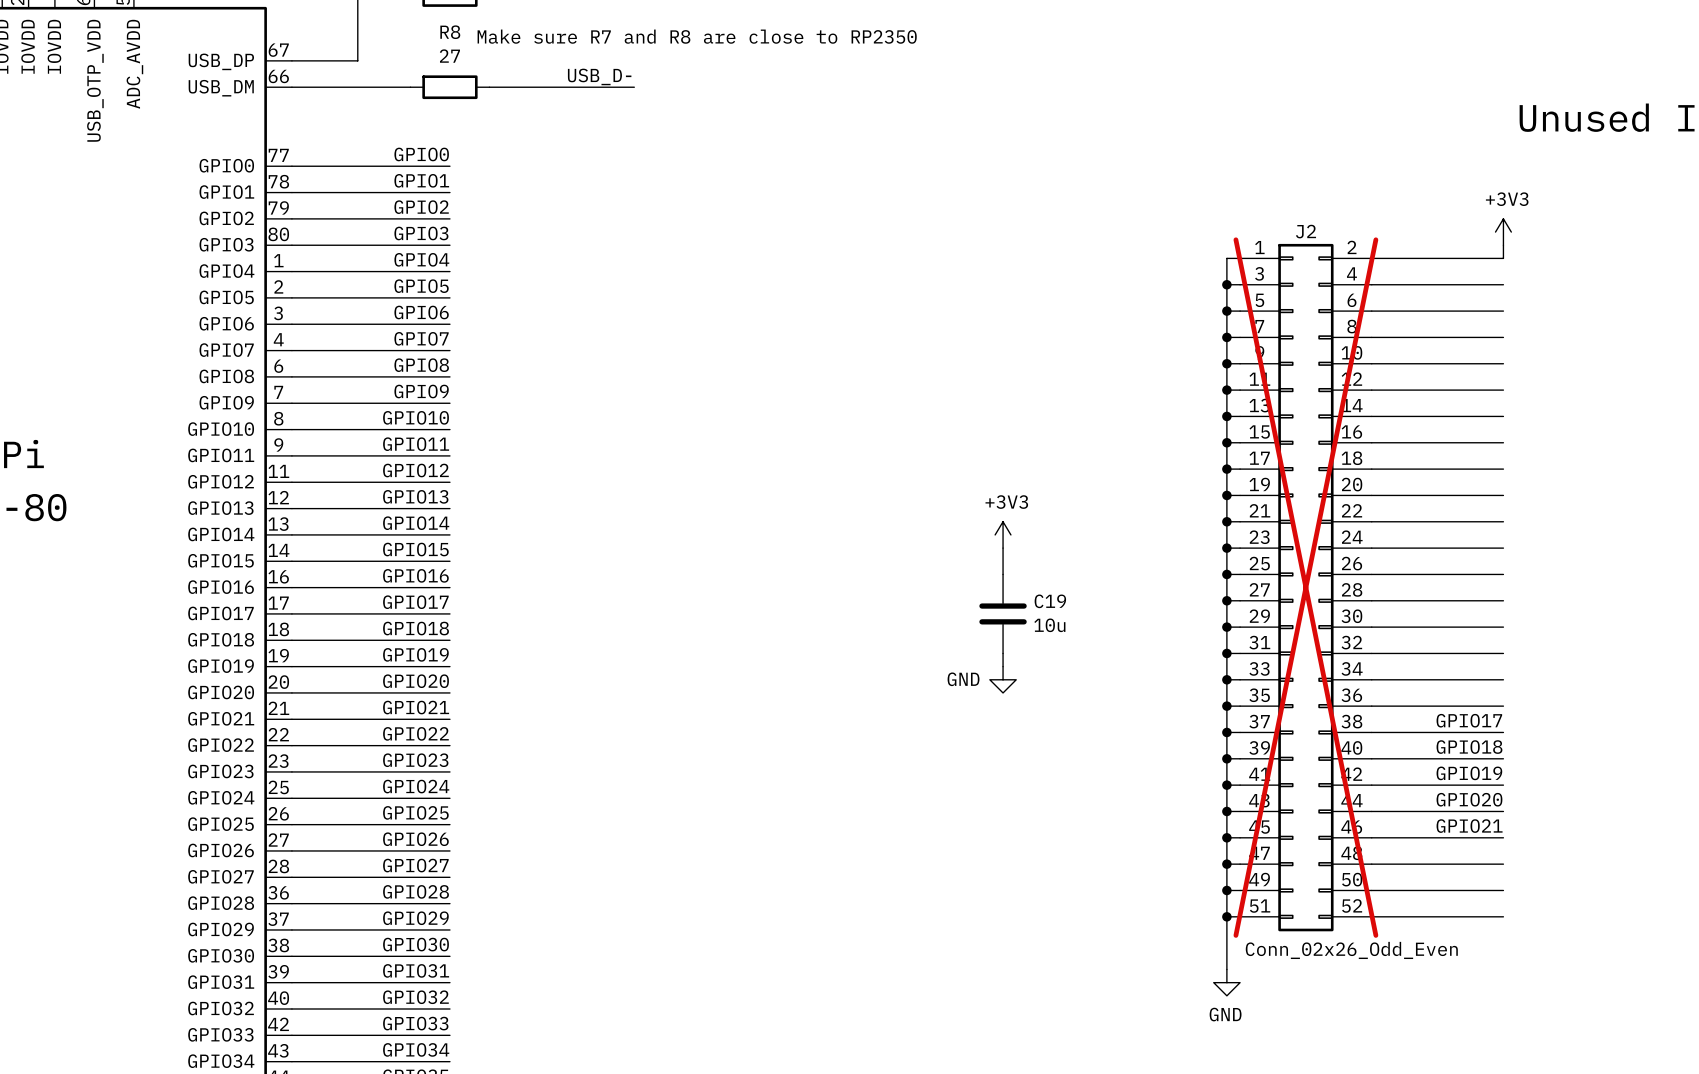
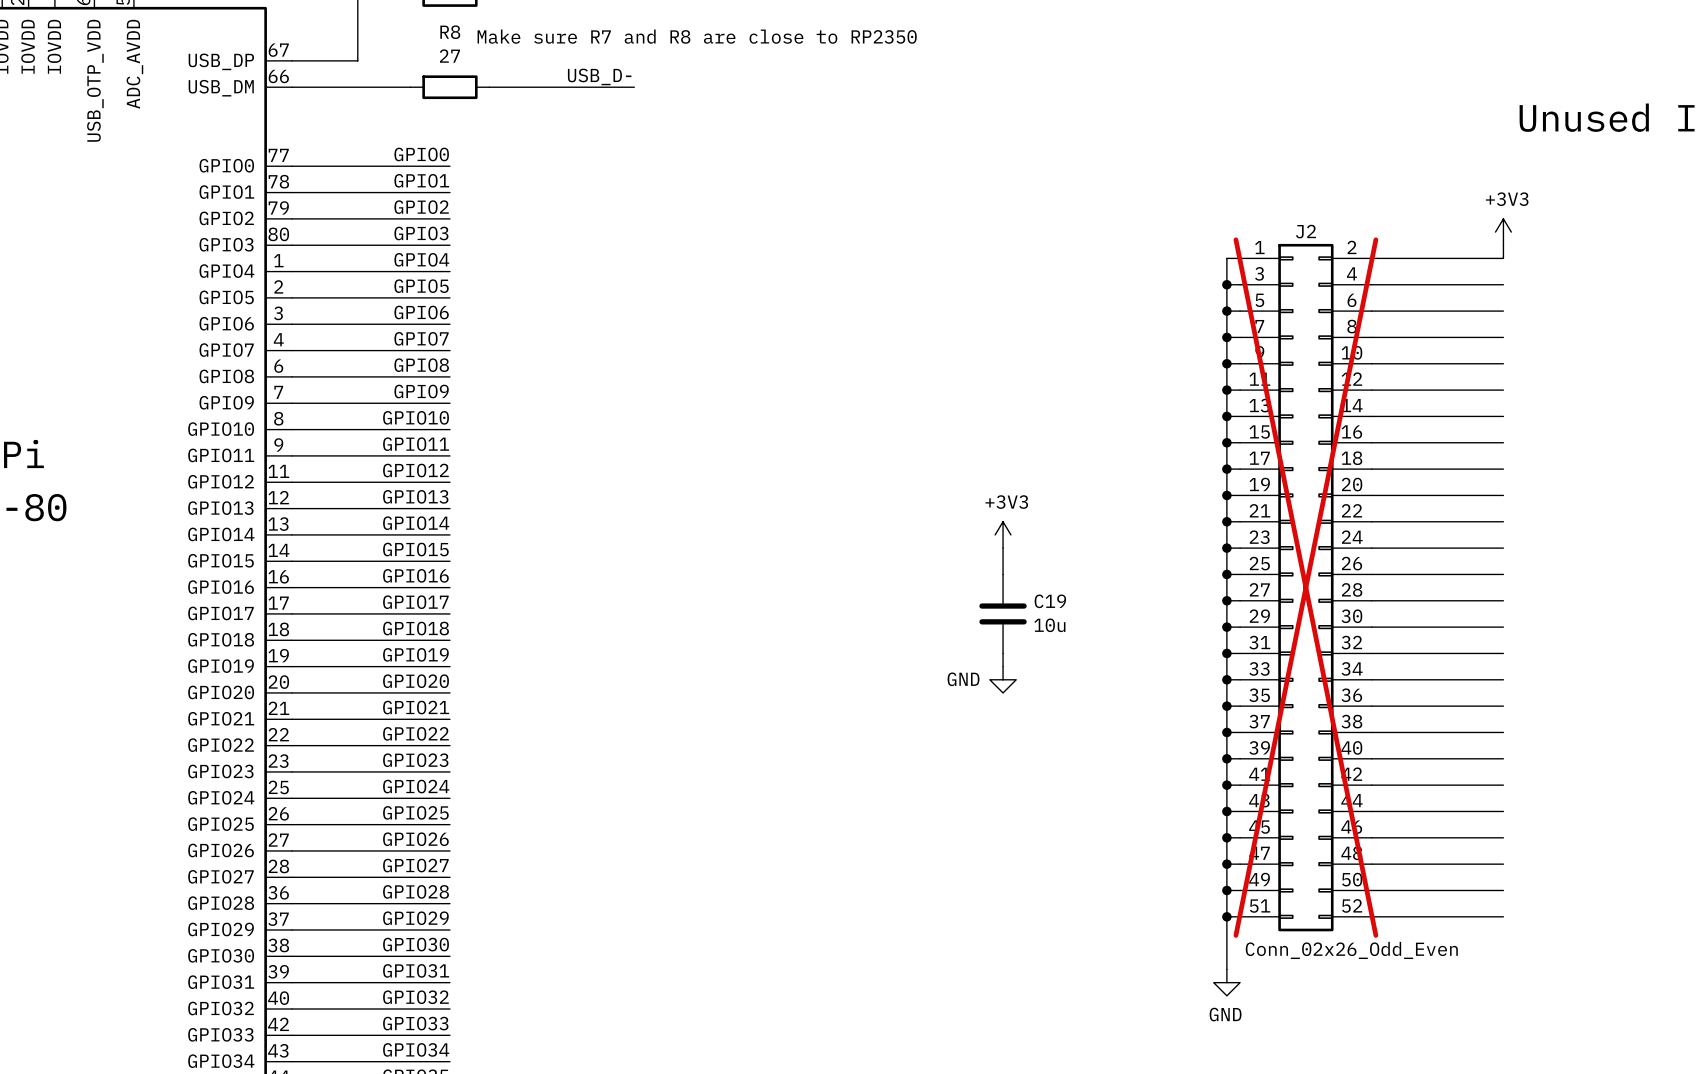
label: GPIO17 (1469, 720) -> none
label: GPIO18 (1469, 747) -> none
label: GPIO19 (1469, 773) -> none
label: GPIO20 (1469, 799) -> none
label: GPIO21 (1469, 826) -> none

